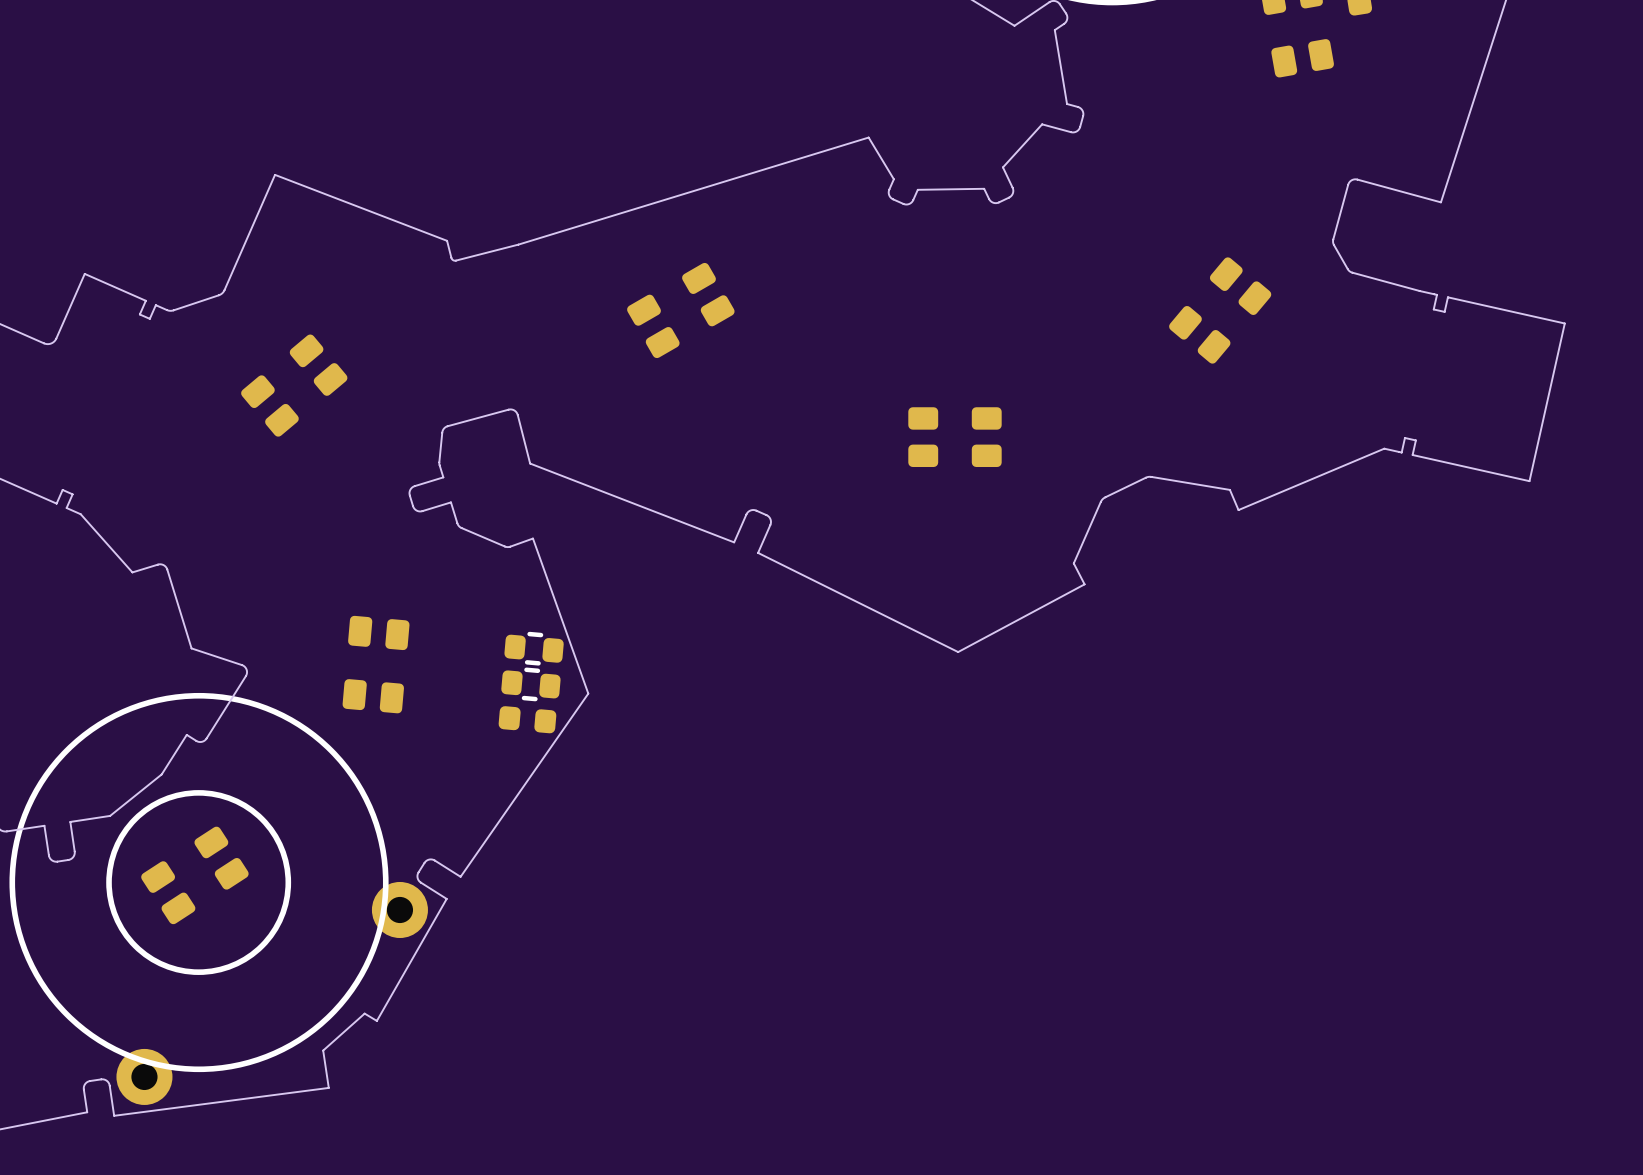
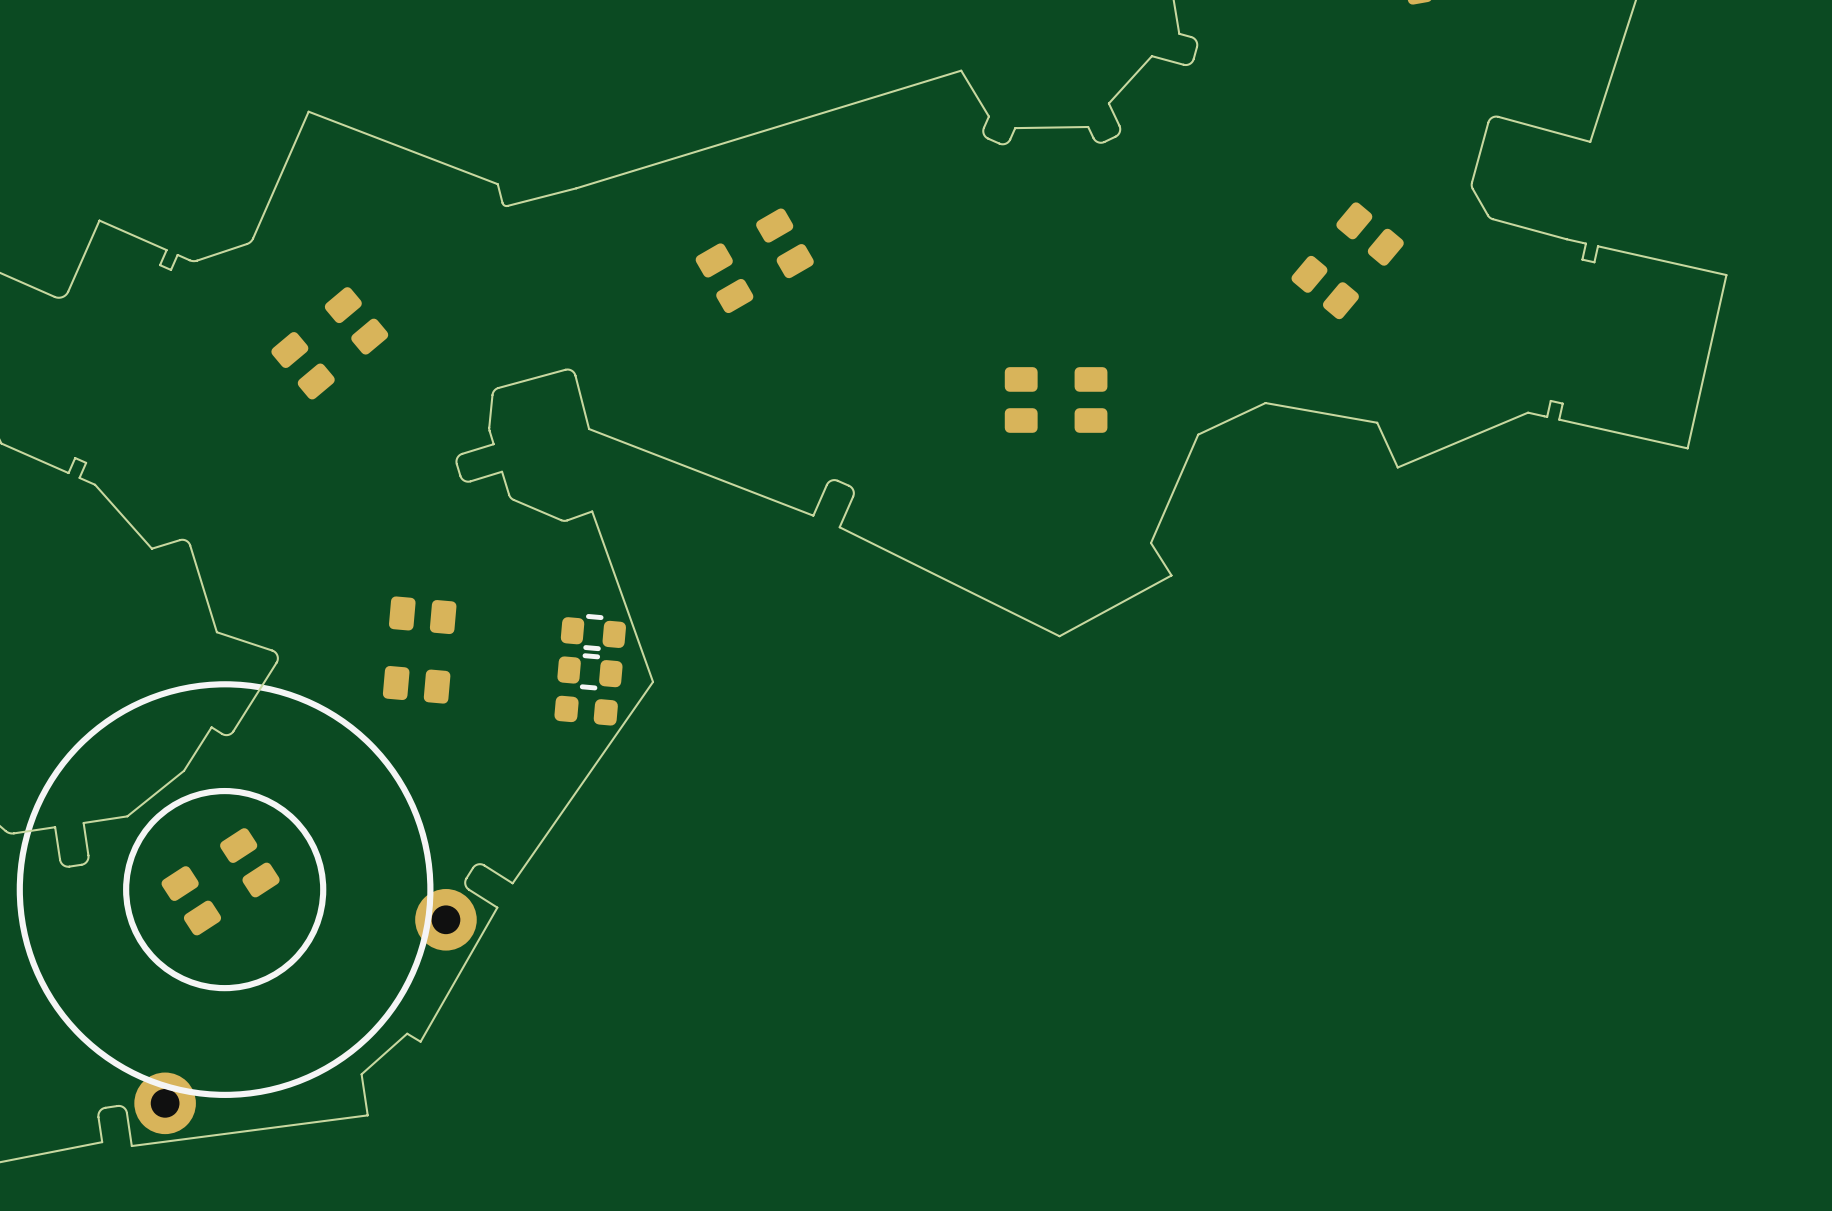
board edge: (1384, 448) (1238, 510) (1229, 489) (1151, 476) (1145, 477) (1101, 501) (1073, 563) (1084, 584) (958, 652) -> (1528, 412) (1397, 467) (1377, 422) (1265, 403) (1198, 434) (1150, 543) (1171, 575) (1059, 636)

